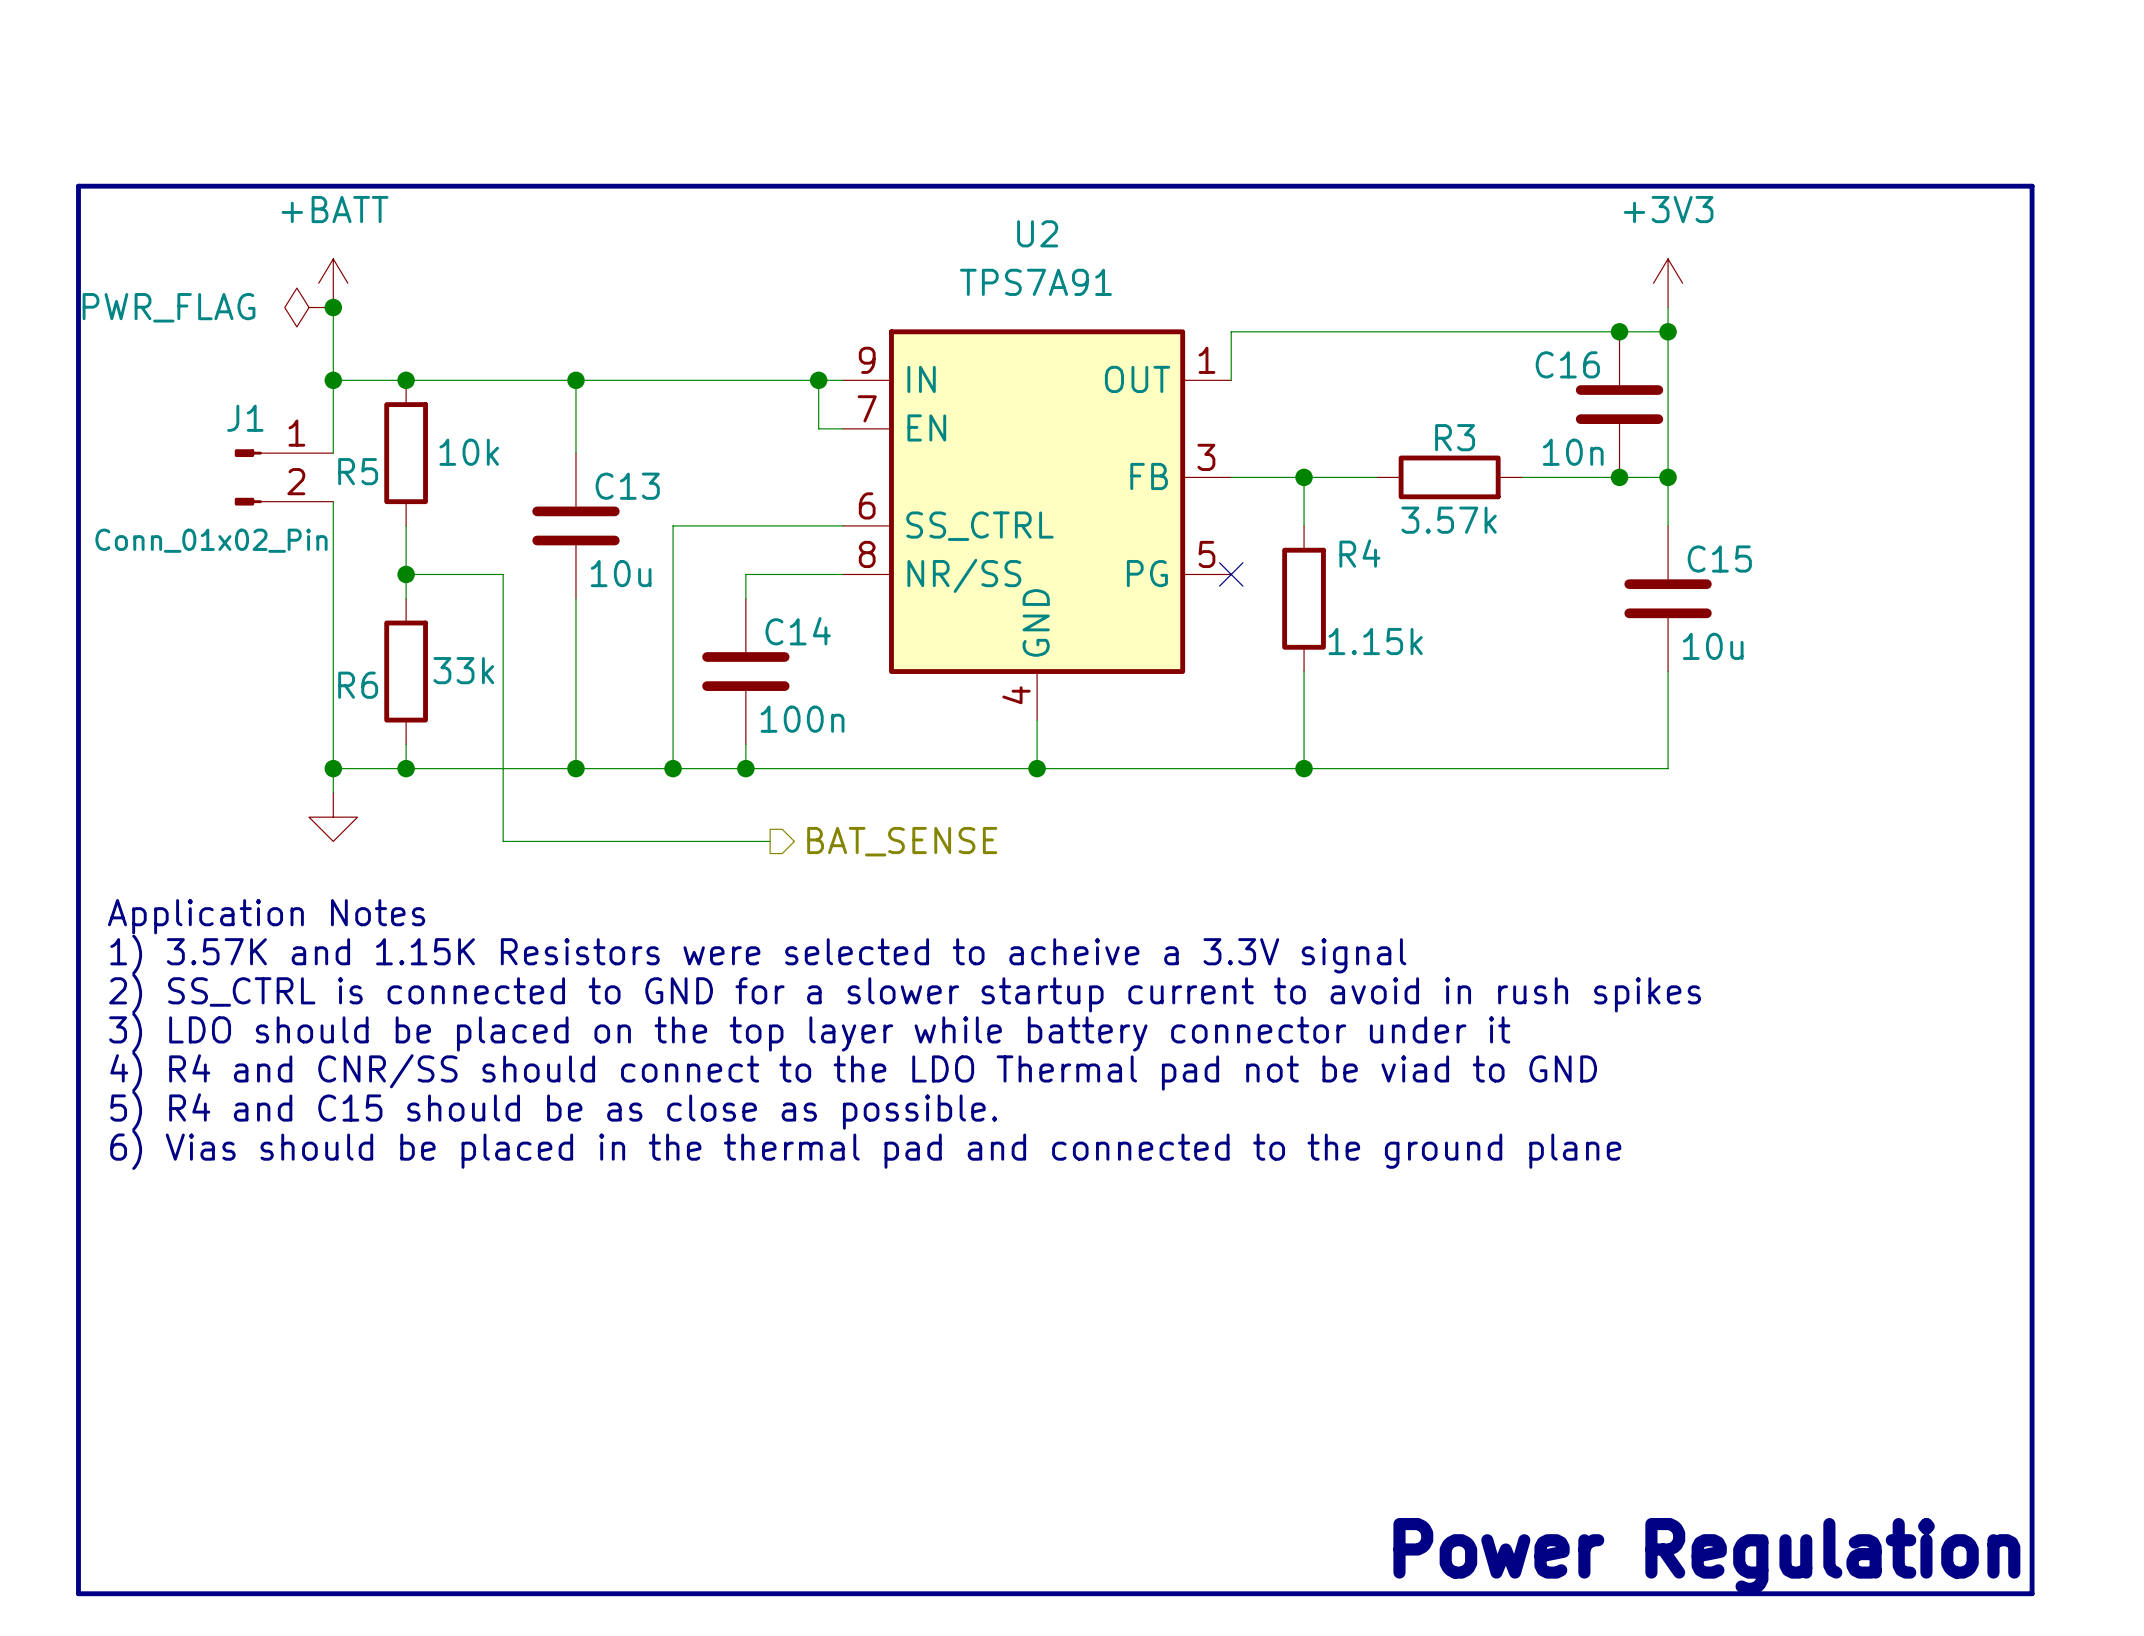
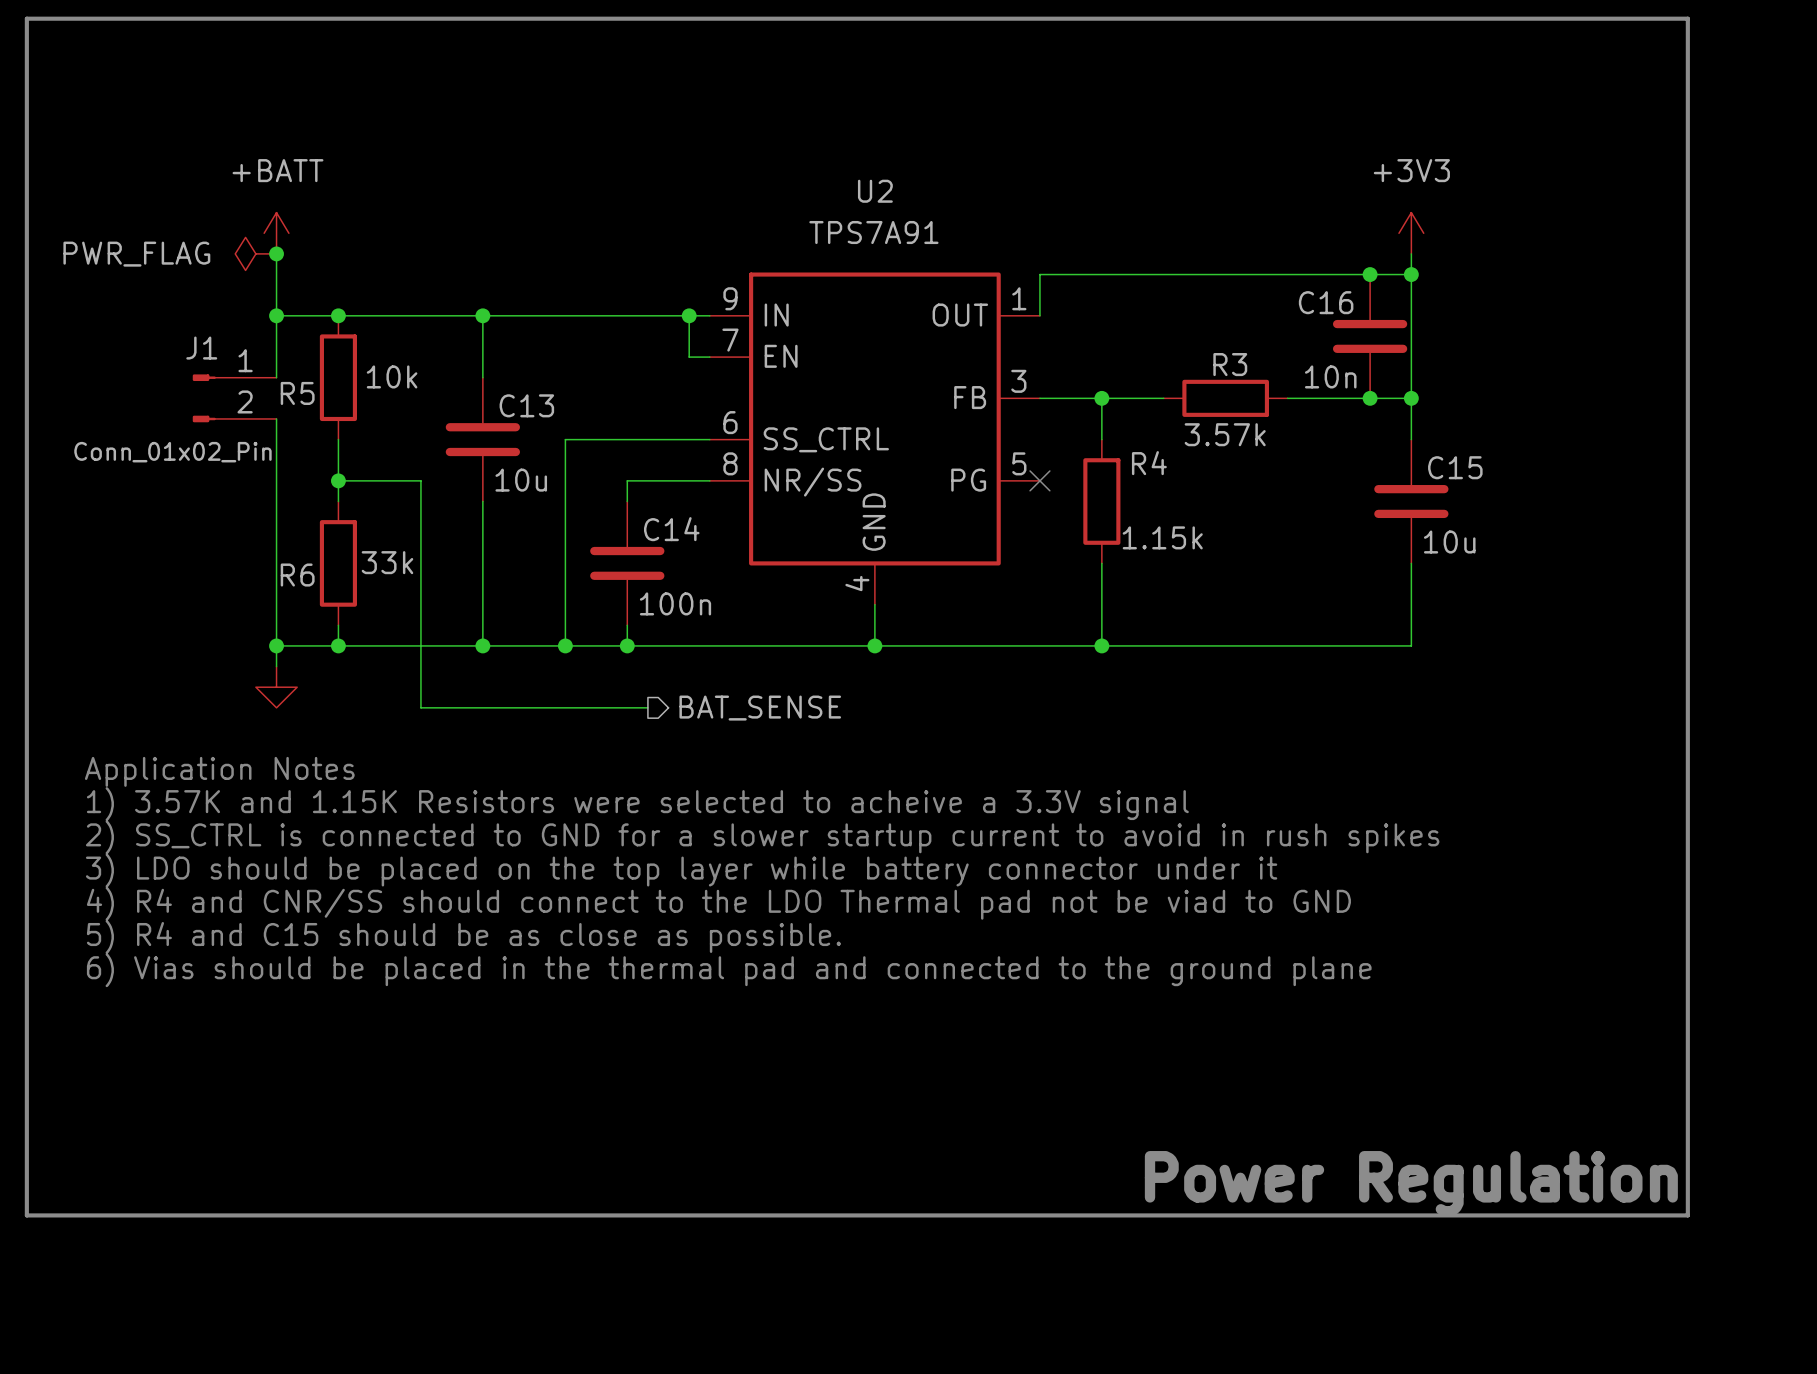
line: (78, 186) (2032, 186) (2032, 1593) (78, 1593) (78, 186) -> (26, 18) (1687, 18) (1687, 1215) (26, 1215) (26, 18)
text position: Power Regulation (1706, 1556) -> Power Regulation (1411, 1183)

